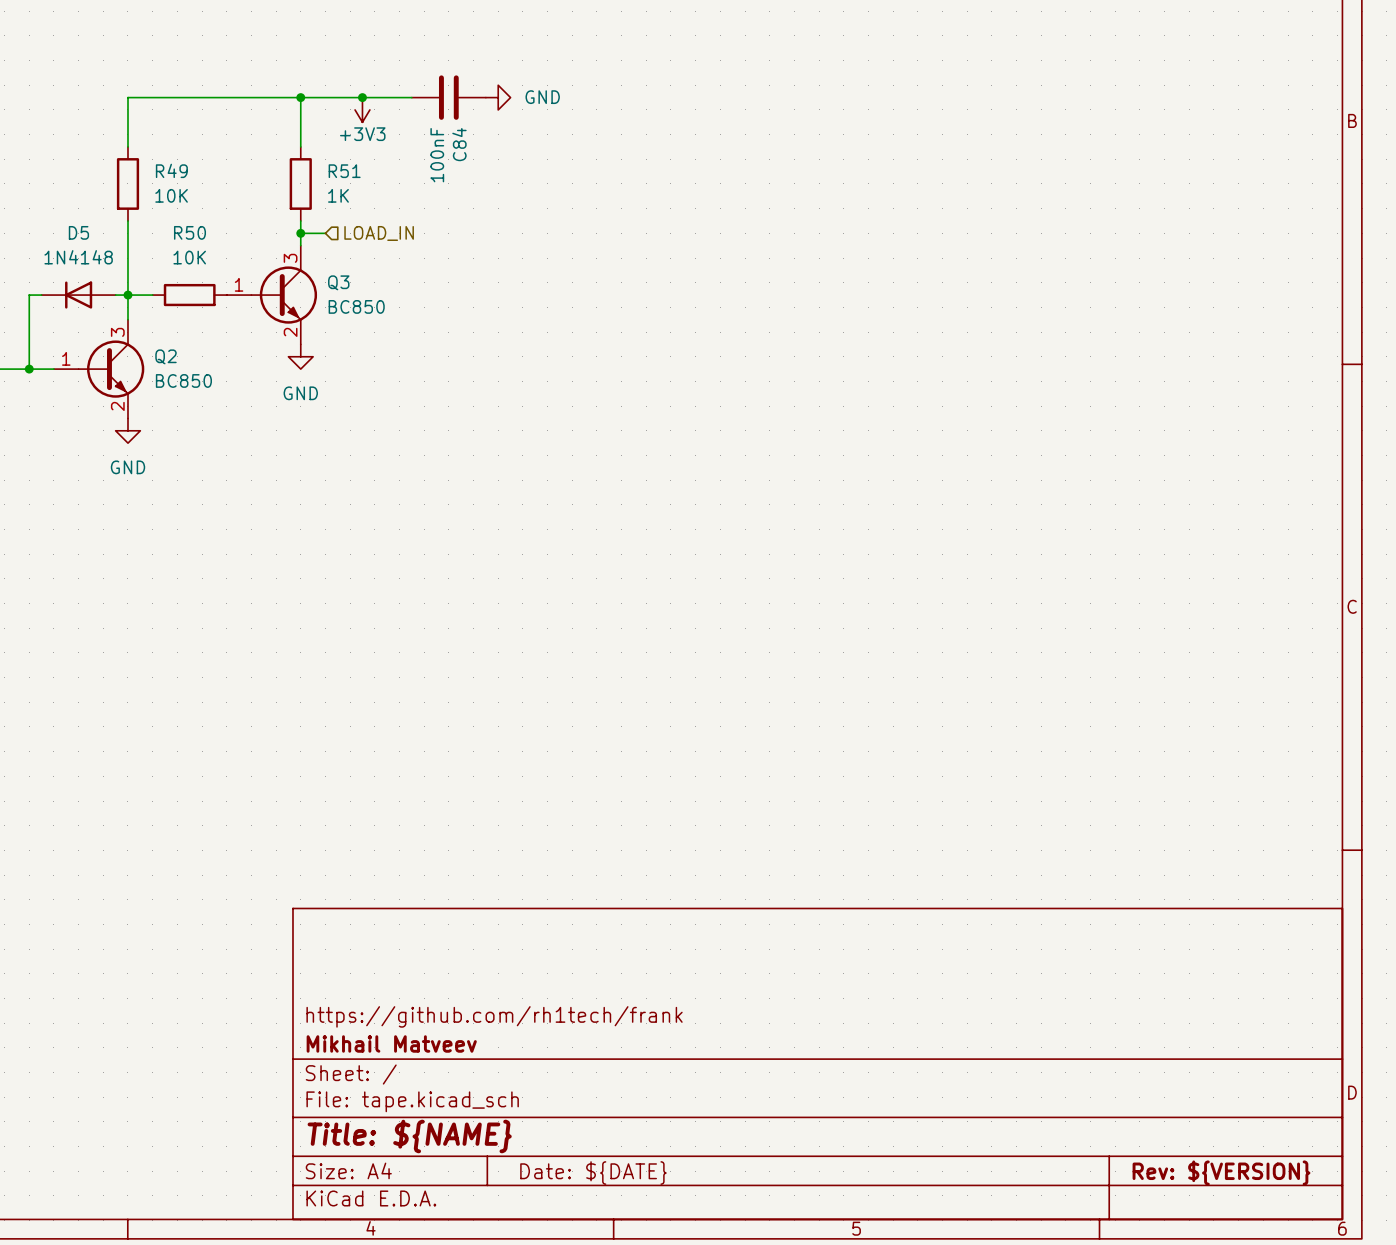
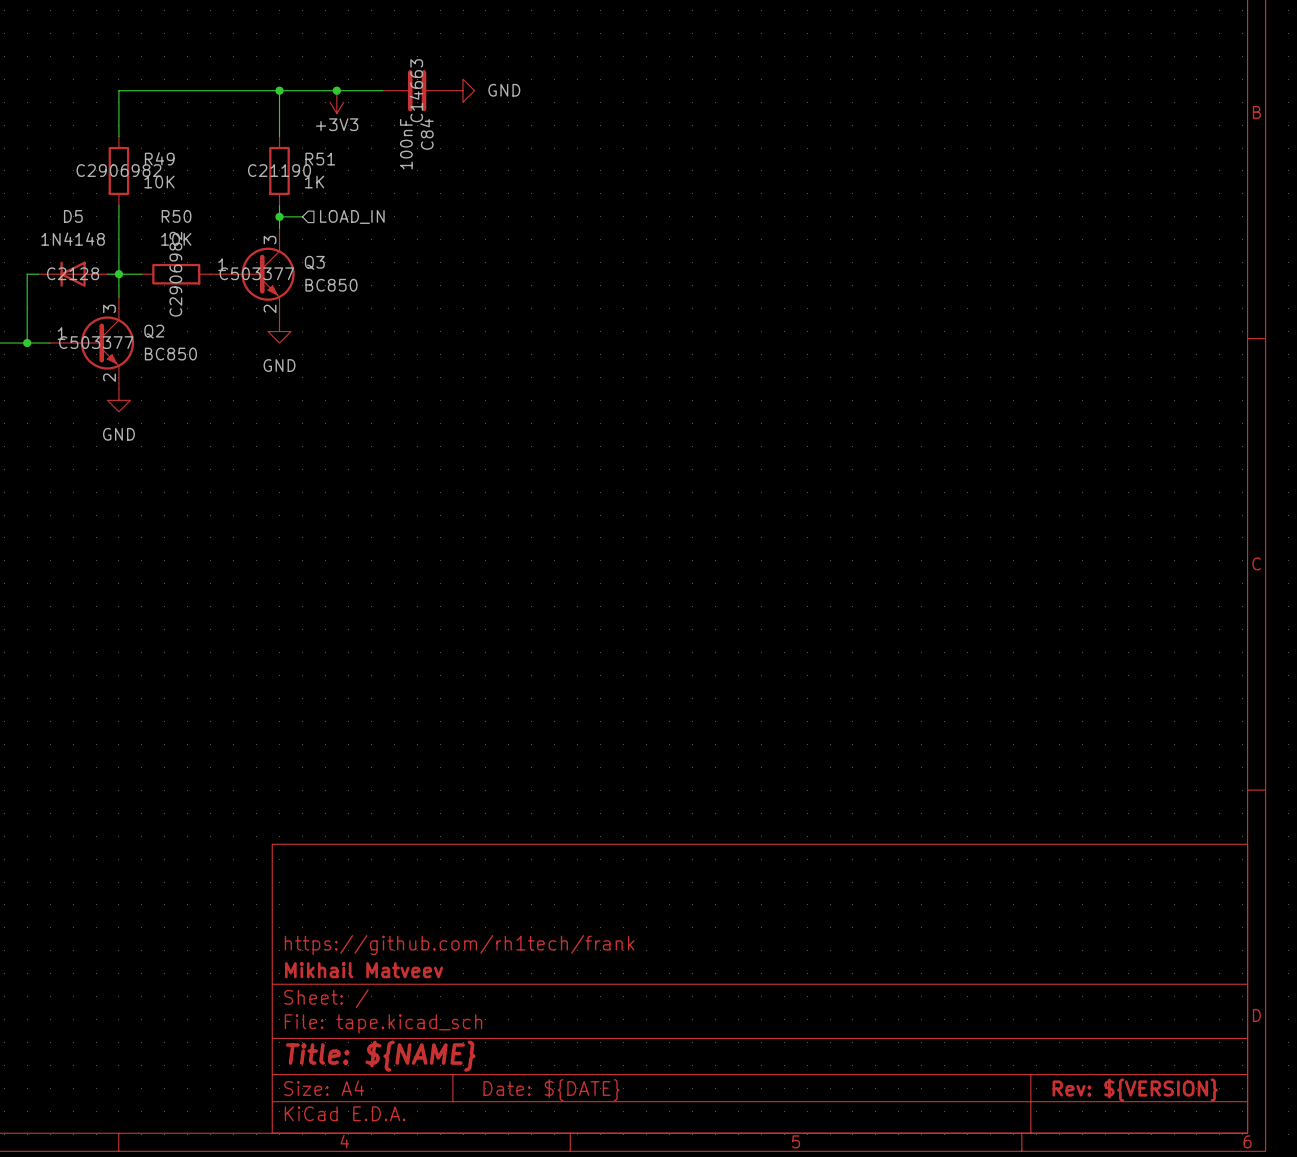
C84 text: none -> C14663 (416, 90)
R49 text: none -> C2906982 (118, 170)
R51 text: none -> C21190 (279, 170)
D5 text: none -> C2128 (73, 273)
Q3 text: none -> C503377 (256, 273)
R50 text: none -> C2906982 (175, 274)
Q2 text: none -> C503377 (96, 342)

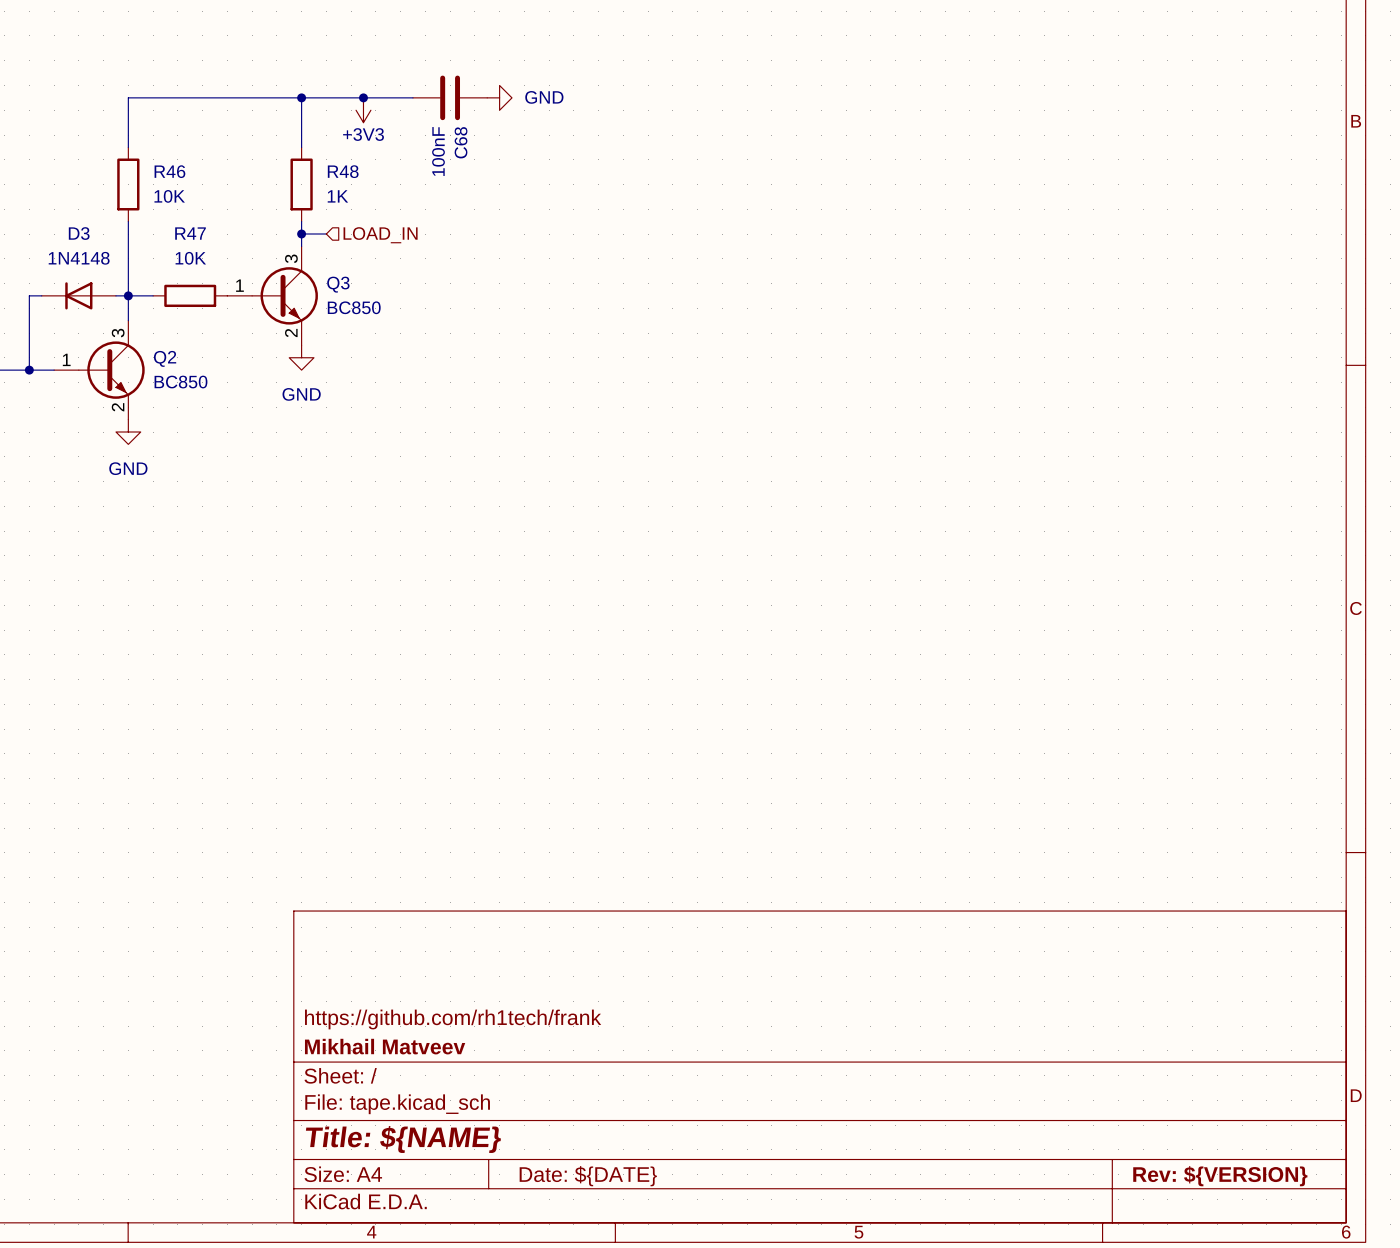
C84 text: C14663 (416, 90) -> none
C84 name: C84 (426, 134) -> C68 (461, 142)
R49 name: R49 (159, 158) -> R46 (169, 171)
R51 name: R51 (320, 159) -> R48 (343, 171)
R49 text: C2906982 (118, 170) -> none
R51 text: C21190 (279, 170) -> none
D5 name: D5 (73, 216) -> D3 (79, 233)
R50 name: R50 (176, 216) -> R47 (190, 233)
D5 text: C2128 (73, 273) -> none
Q3 text: C503377 (256, 273) -> none
R50 text: C2906982 (175, 274) -> none
Q2 text: C503377 (96, 342) -> none

